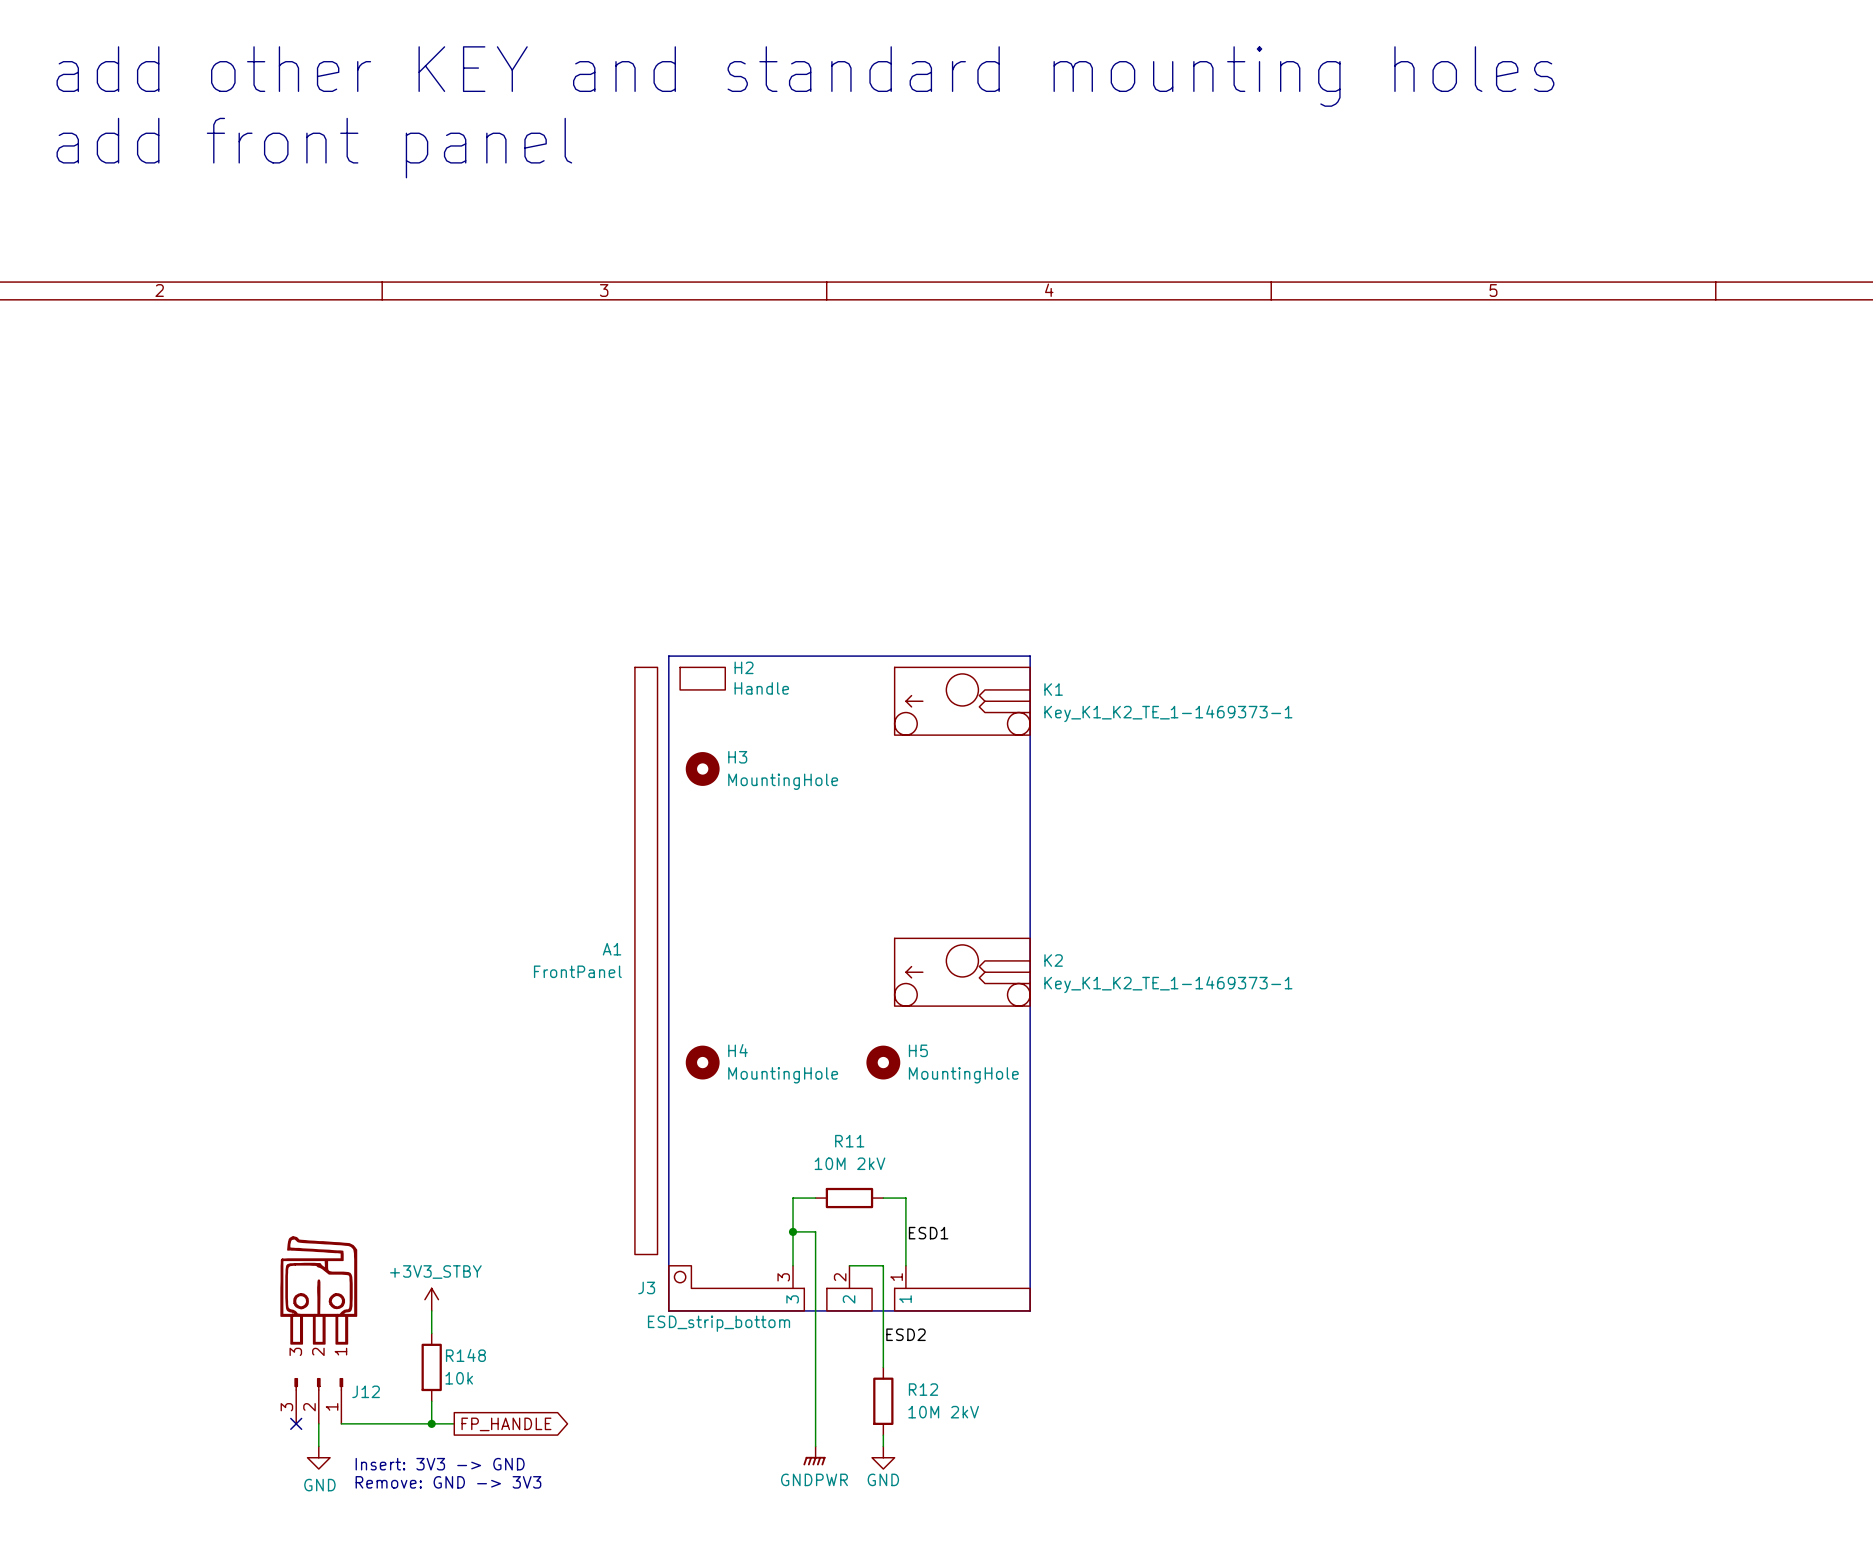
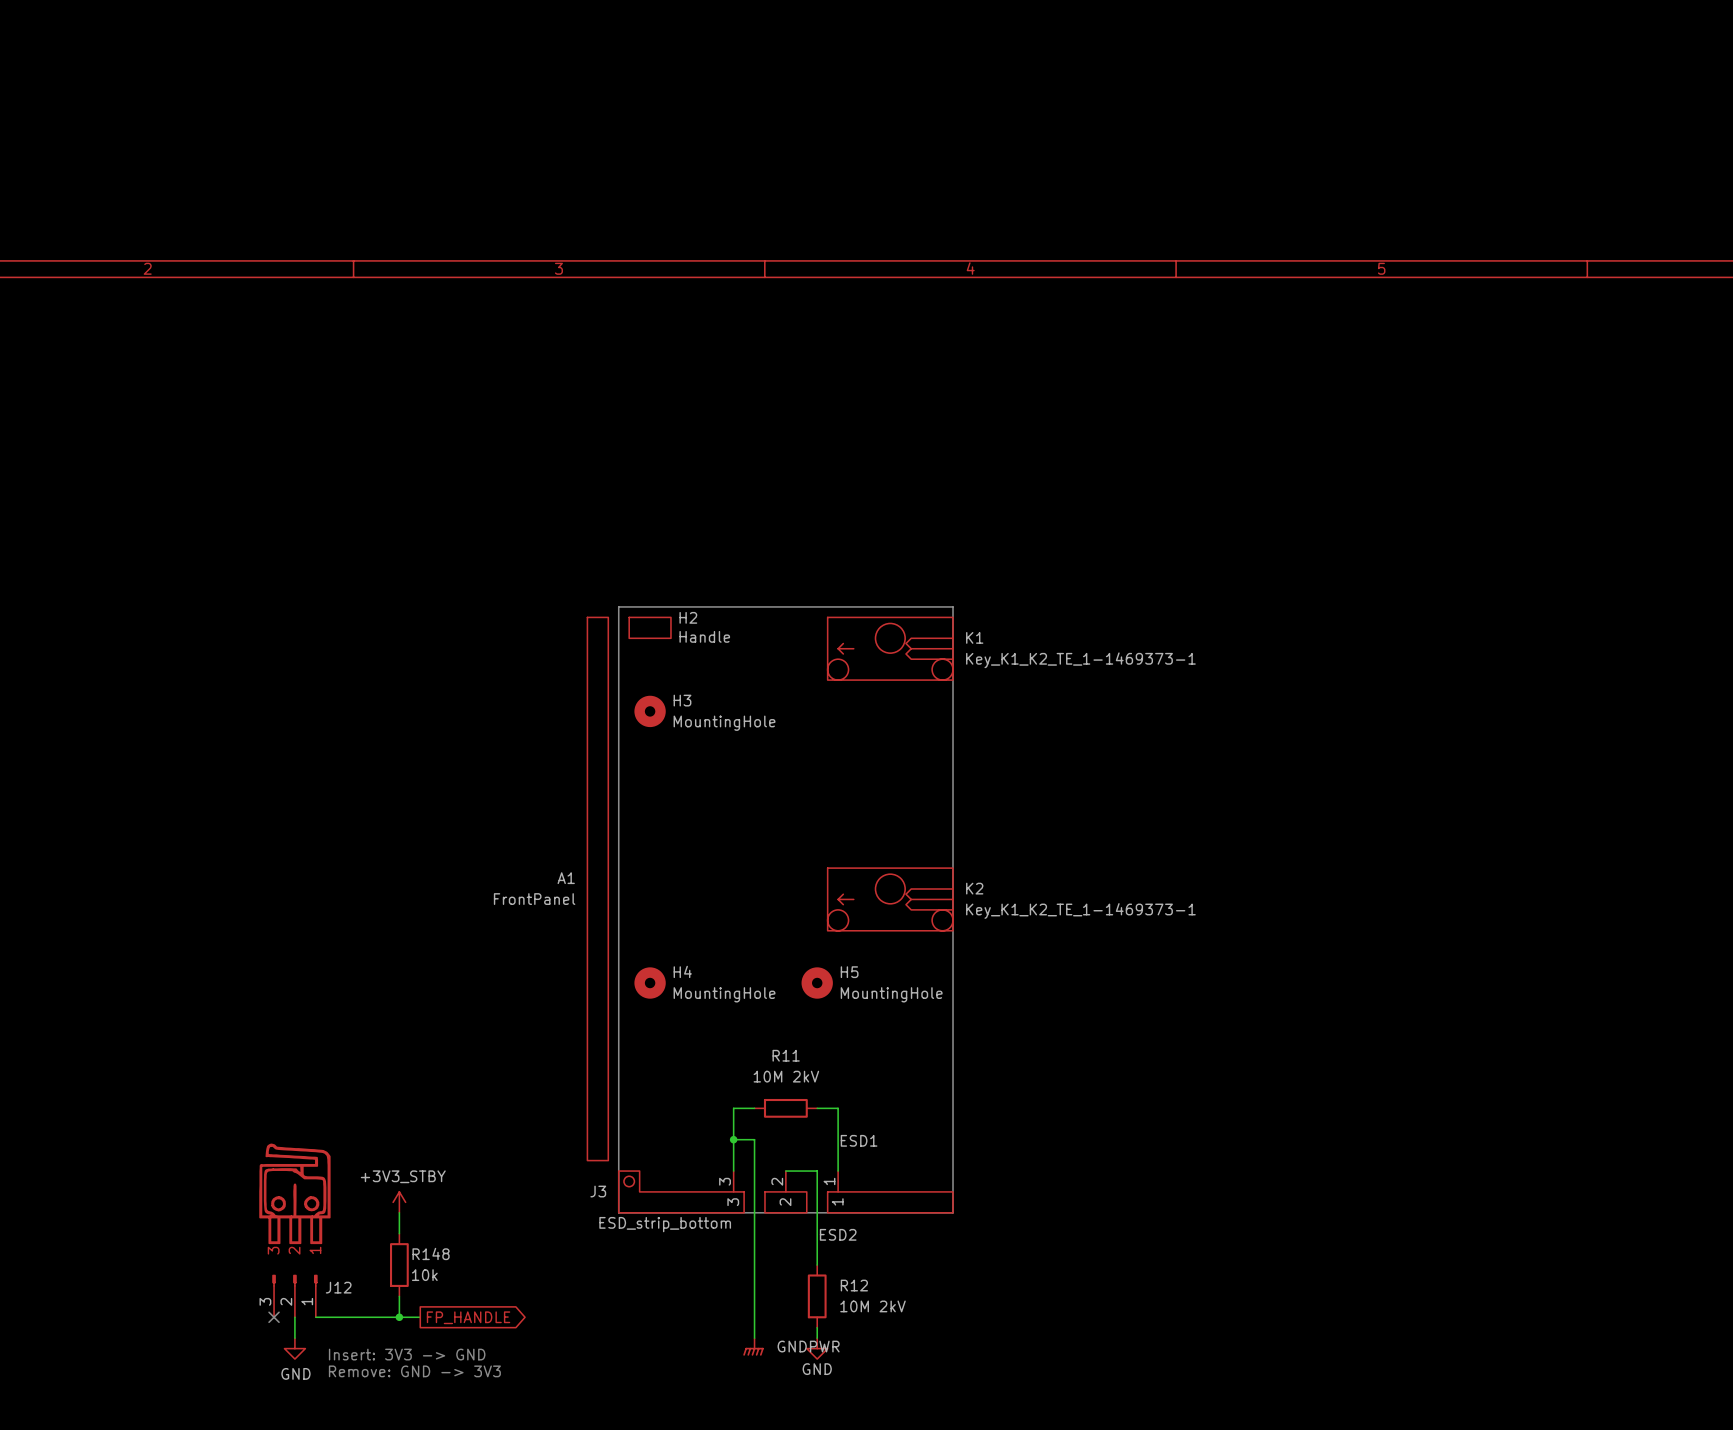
text: add other KEY and standard mounting holes (805, 76) -> none
text: add front panel (314, 148) -> none
power symbol text position: GNDPWR (814, 1479) -> GNDPWR (808, 1346)

